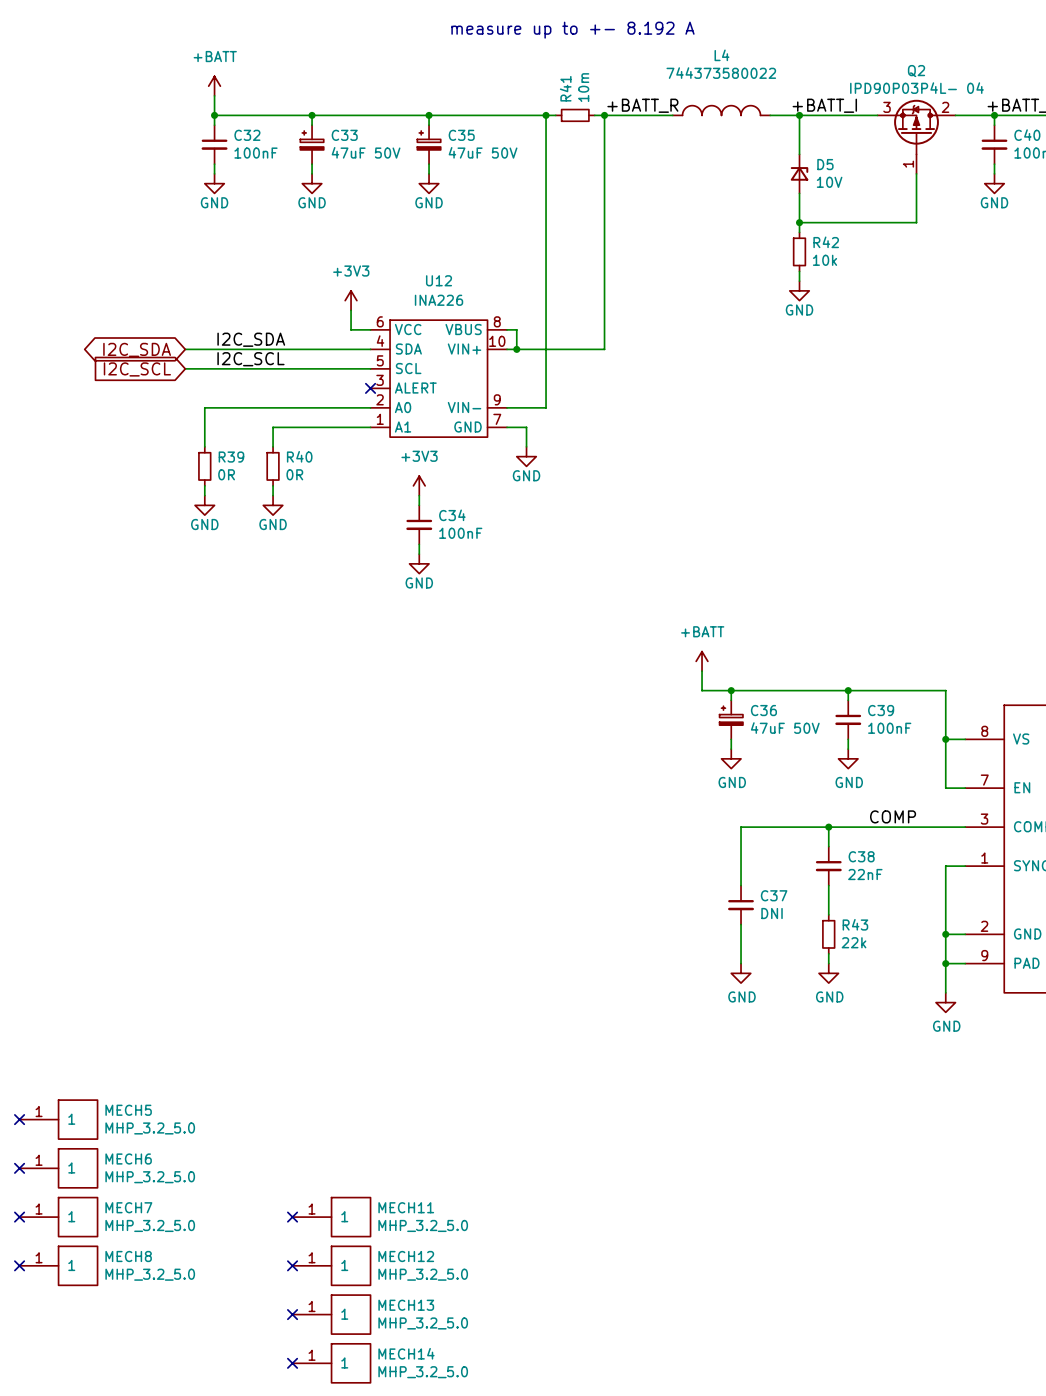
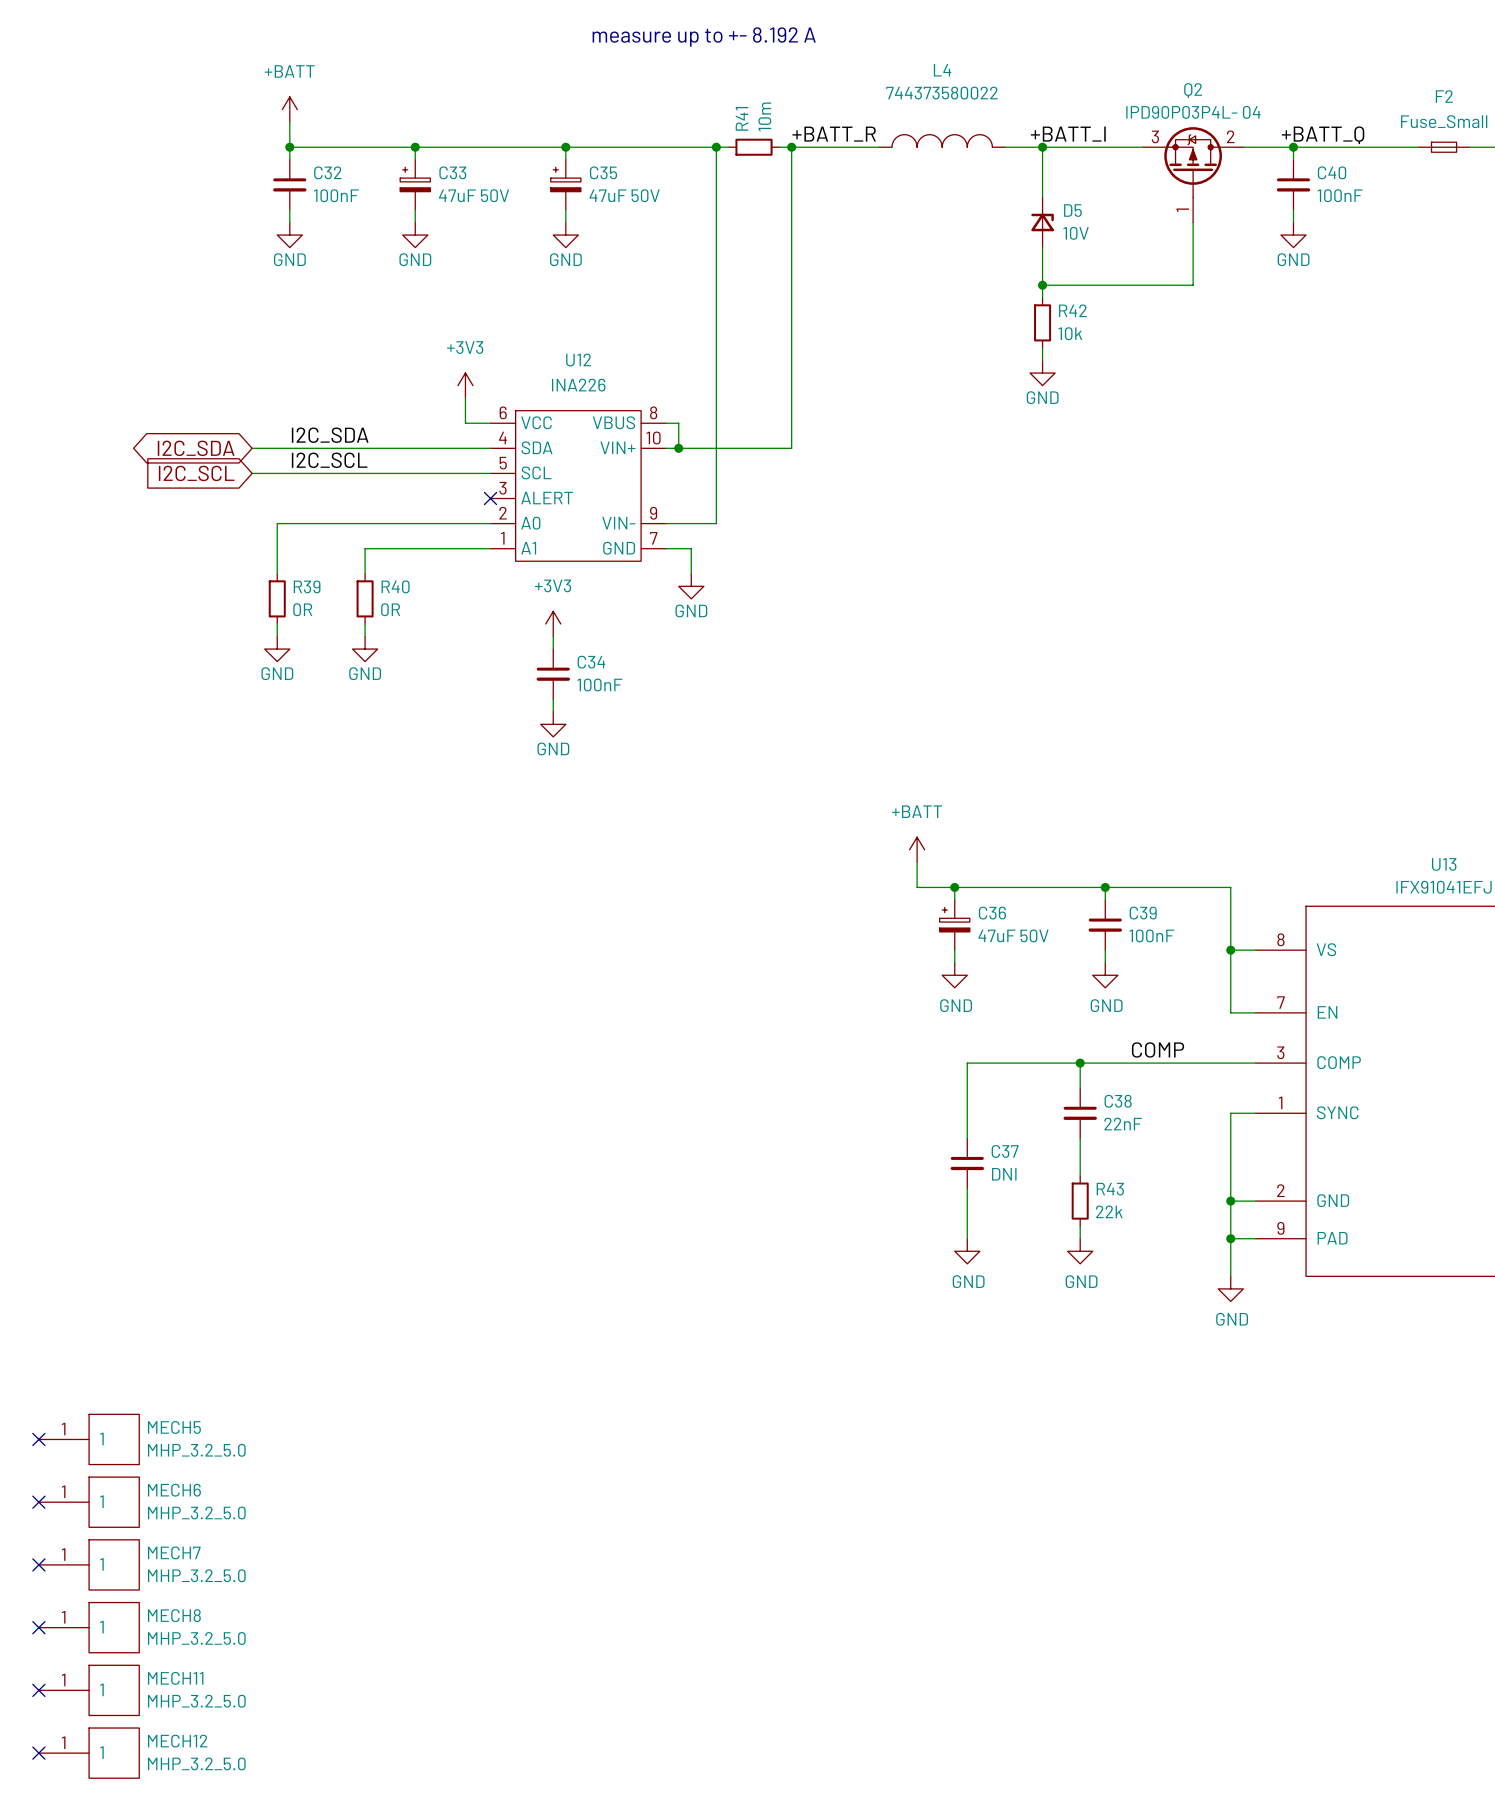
no-connect mark: (292, 1217) -> none
MECH11 position: (331, 1217) -> (89, 1690)
no-connect mark: (292, 1265) -> none
MECH12 position: (331, 1265) -> (89, 1753)
no-connect mark: none -> (38, 1690)
no-connect mark: (292, 1314) -> none
MECH13: MHP_3.2_5.0 (331, 1314) -> none
no-connect mark: none -> (38, 1753)
no-connect mark: (292, 1363) -> none
MECH14: MHP_3.2_5.0 (331, 1363) -> none

